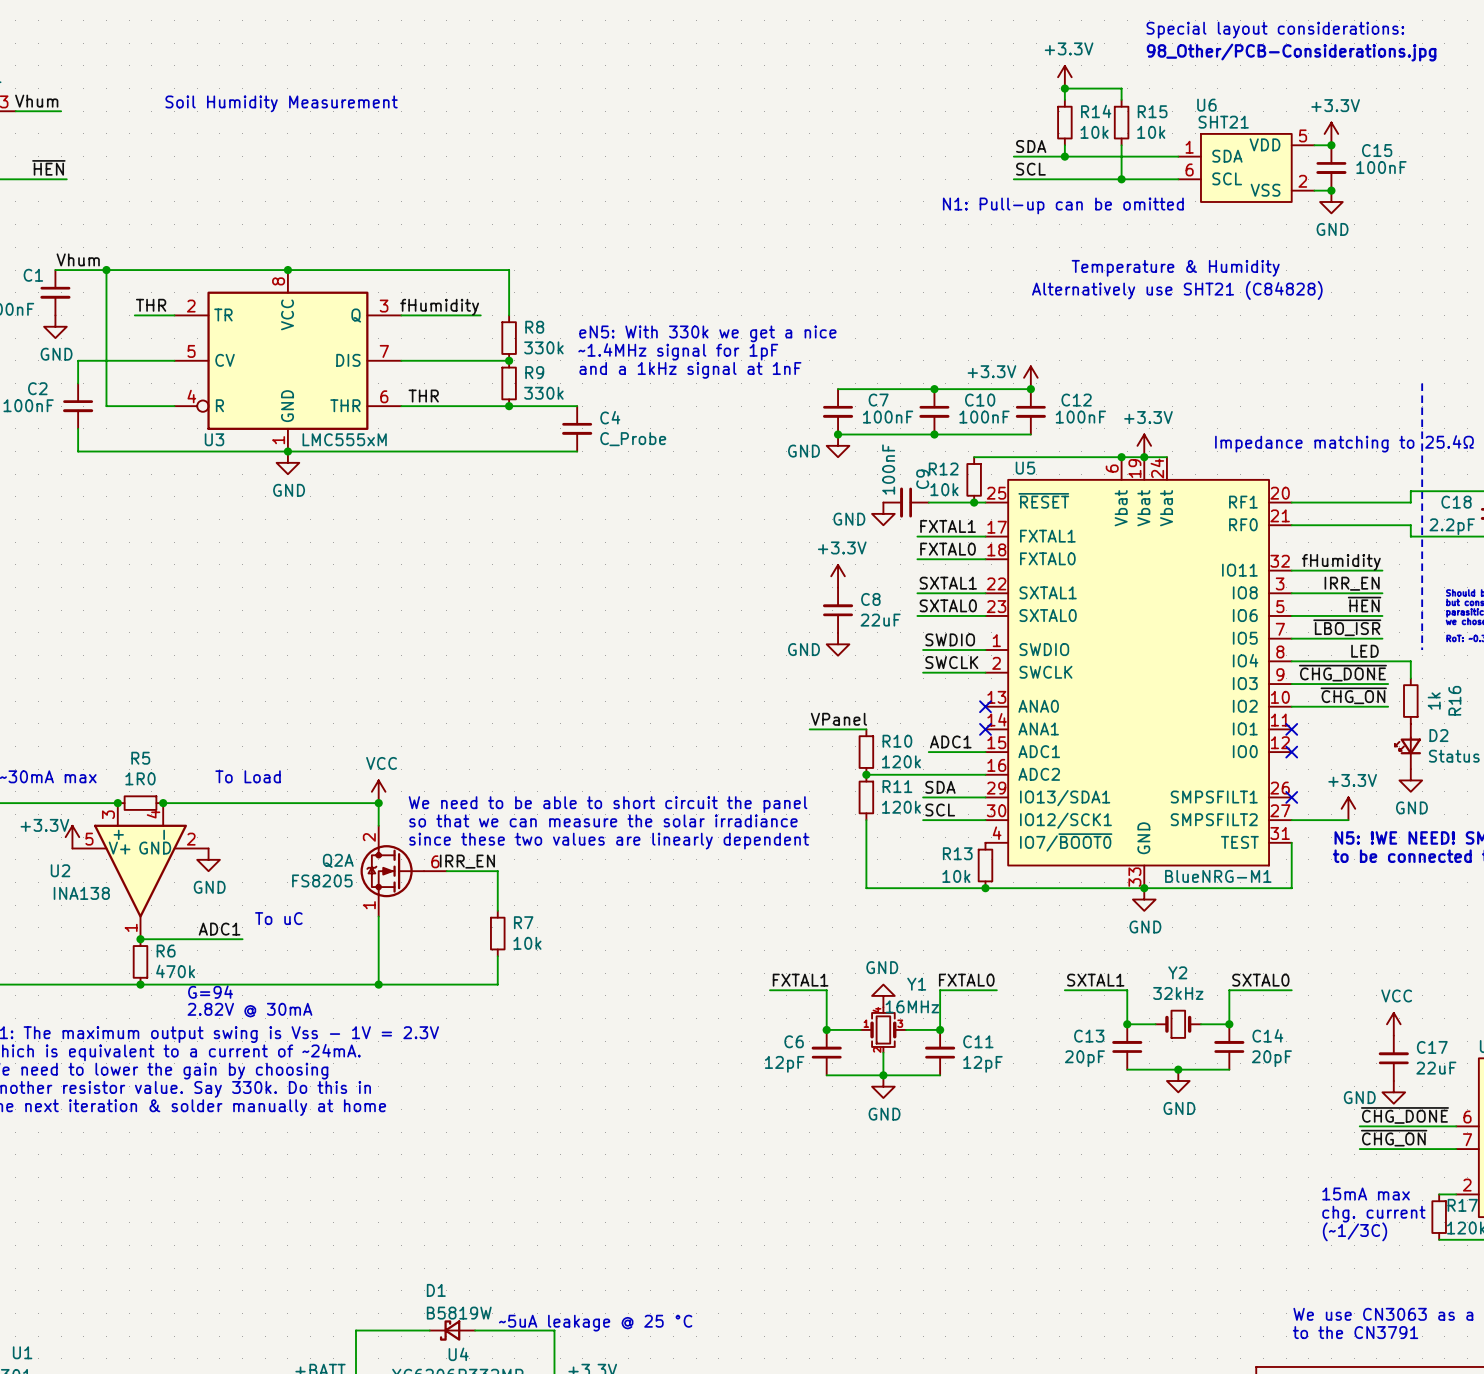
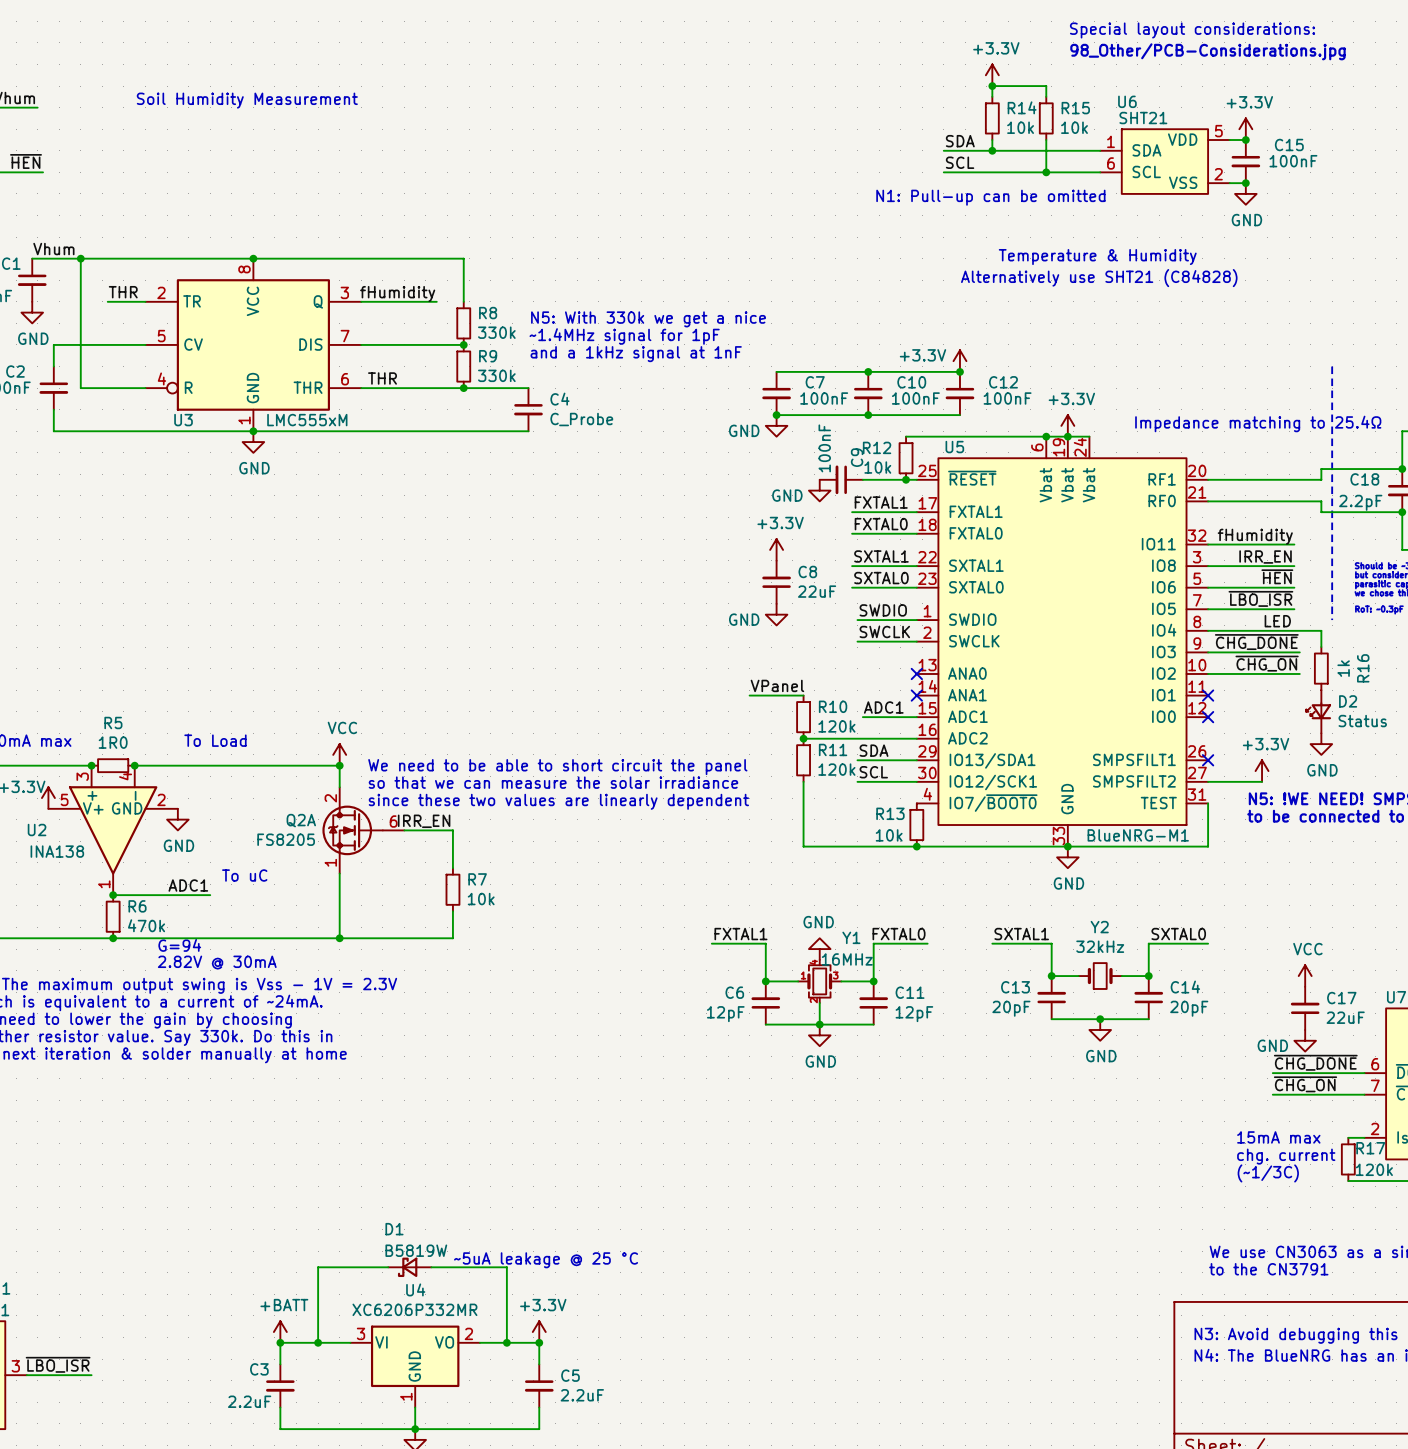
text: eN5: With 330k we get a nice (707, 333) -> N5: With 330k we get a nice (648, 319)

